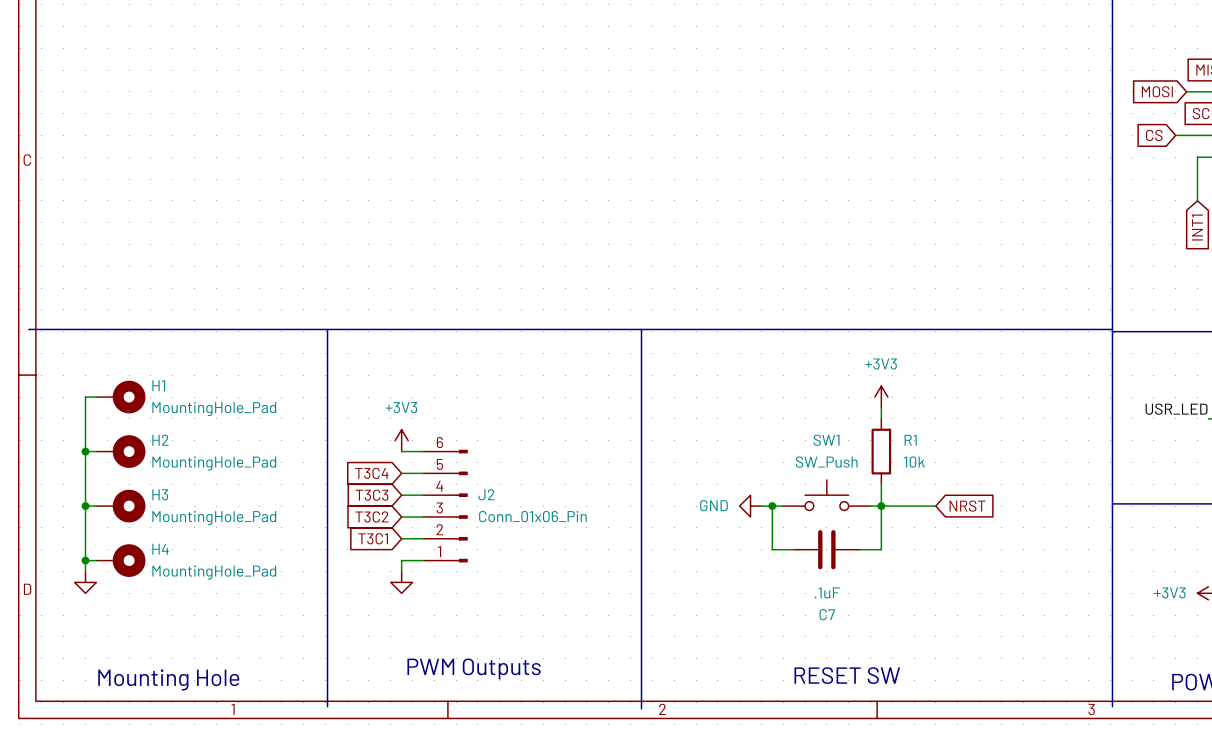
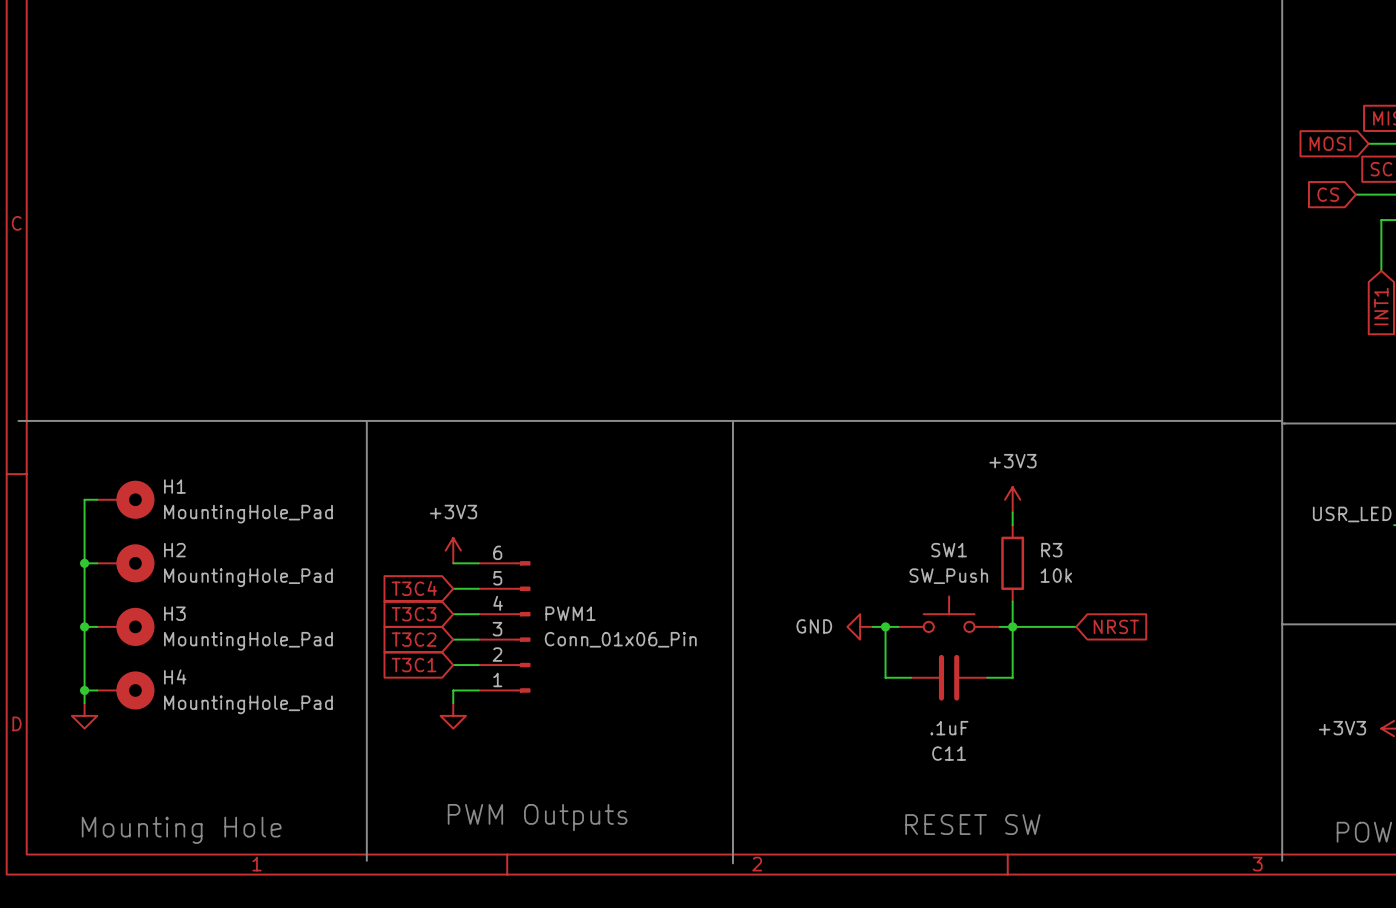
R1 name: R1 (910, 440) -> R3 (1051, 550)
J2 name: J2 (486, 494) -> PWM1 (570, 613)
C7 name: C7 (827, 614) -> C11 (949, 753)

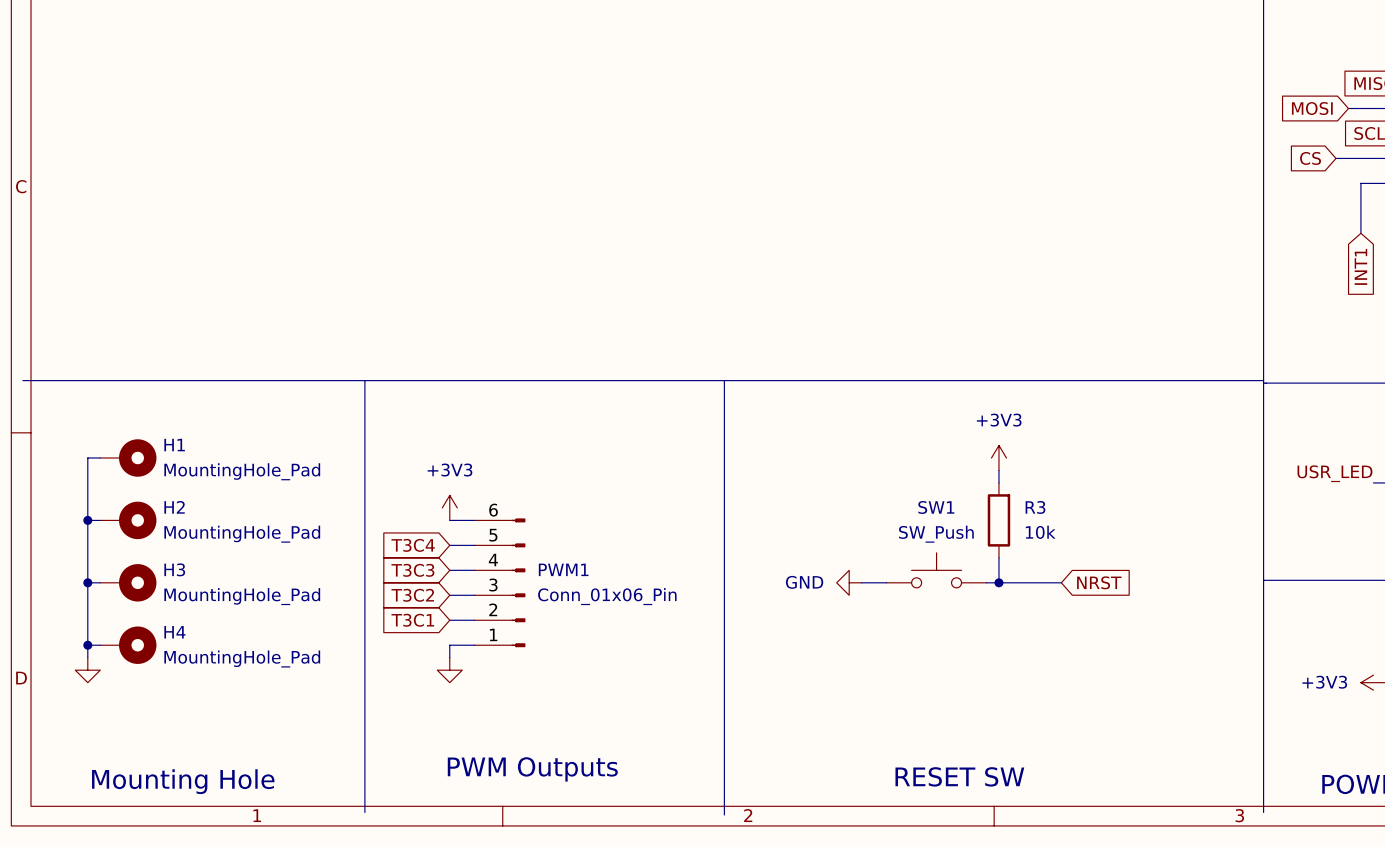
wire: (885, 626) (885, 677) (910, 677) -> none
junction: (885, 626) -> none
wire: (1012, 626) (1012, 677) (987, 677) -> none
C11: .1uF (949, 677) -> none

